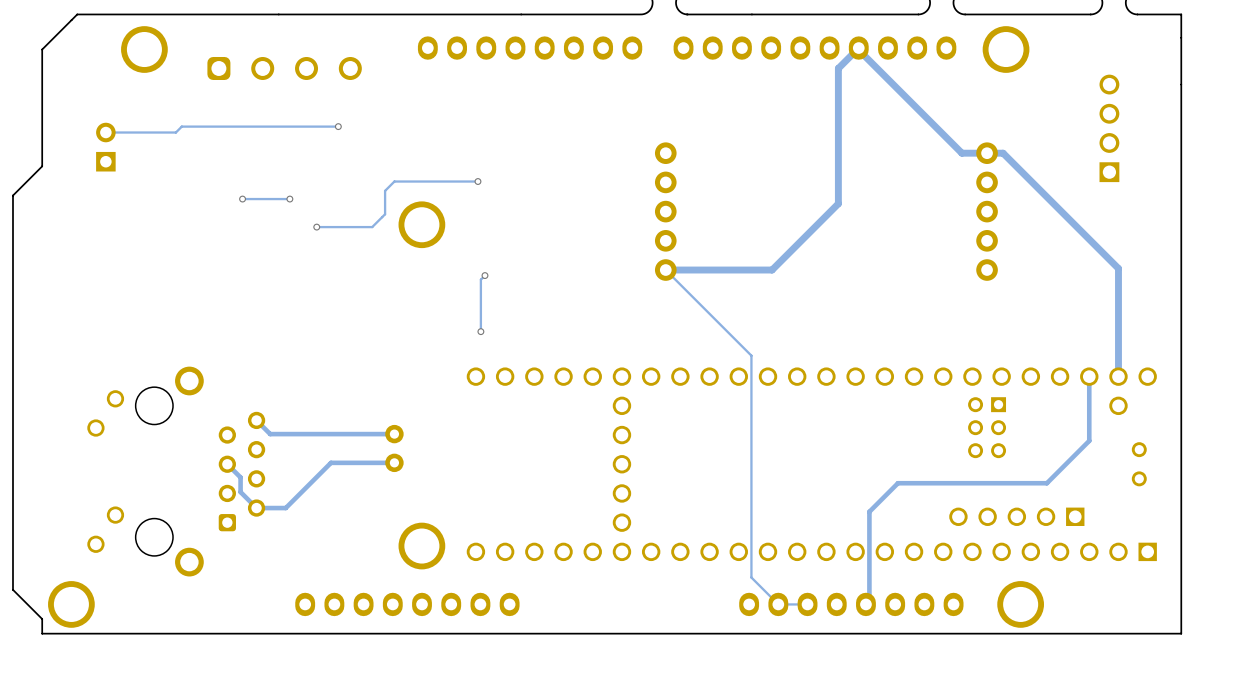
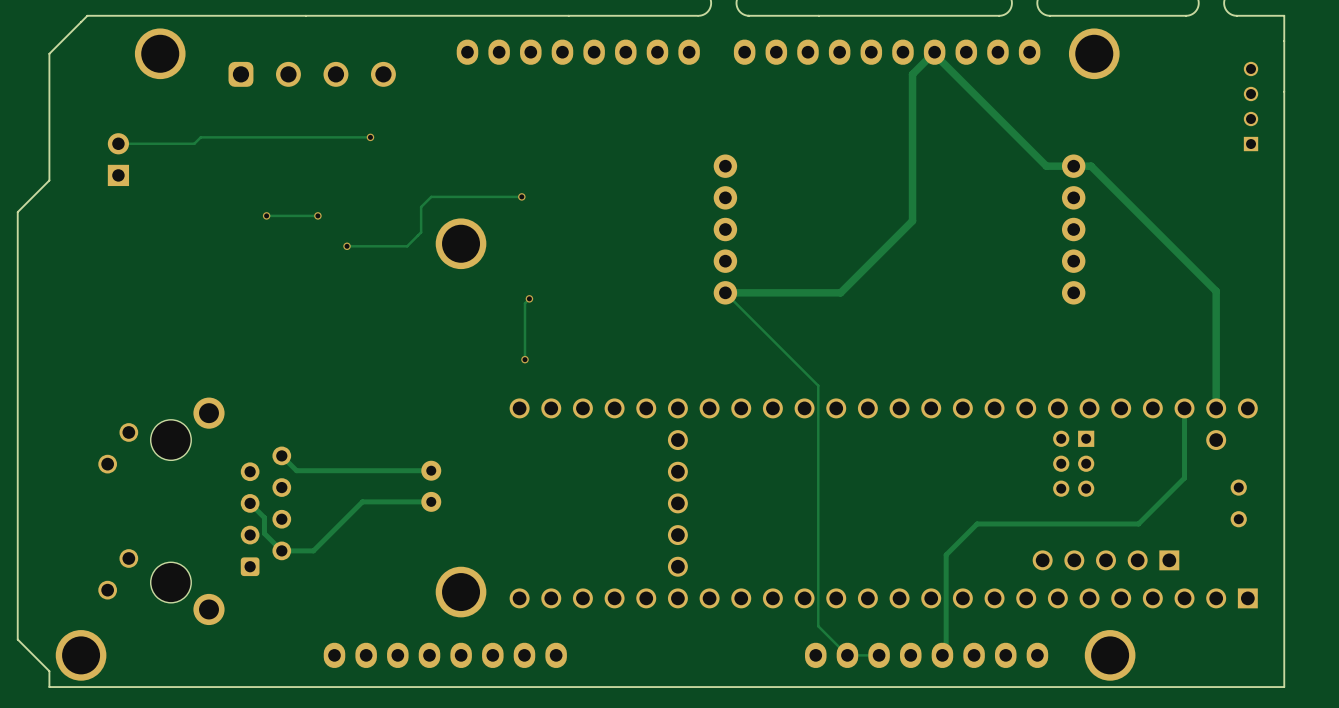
part: none -> (1251, 106)
part: (1109, 128) -> none

